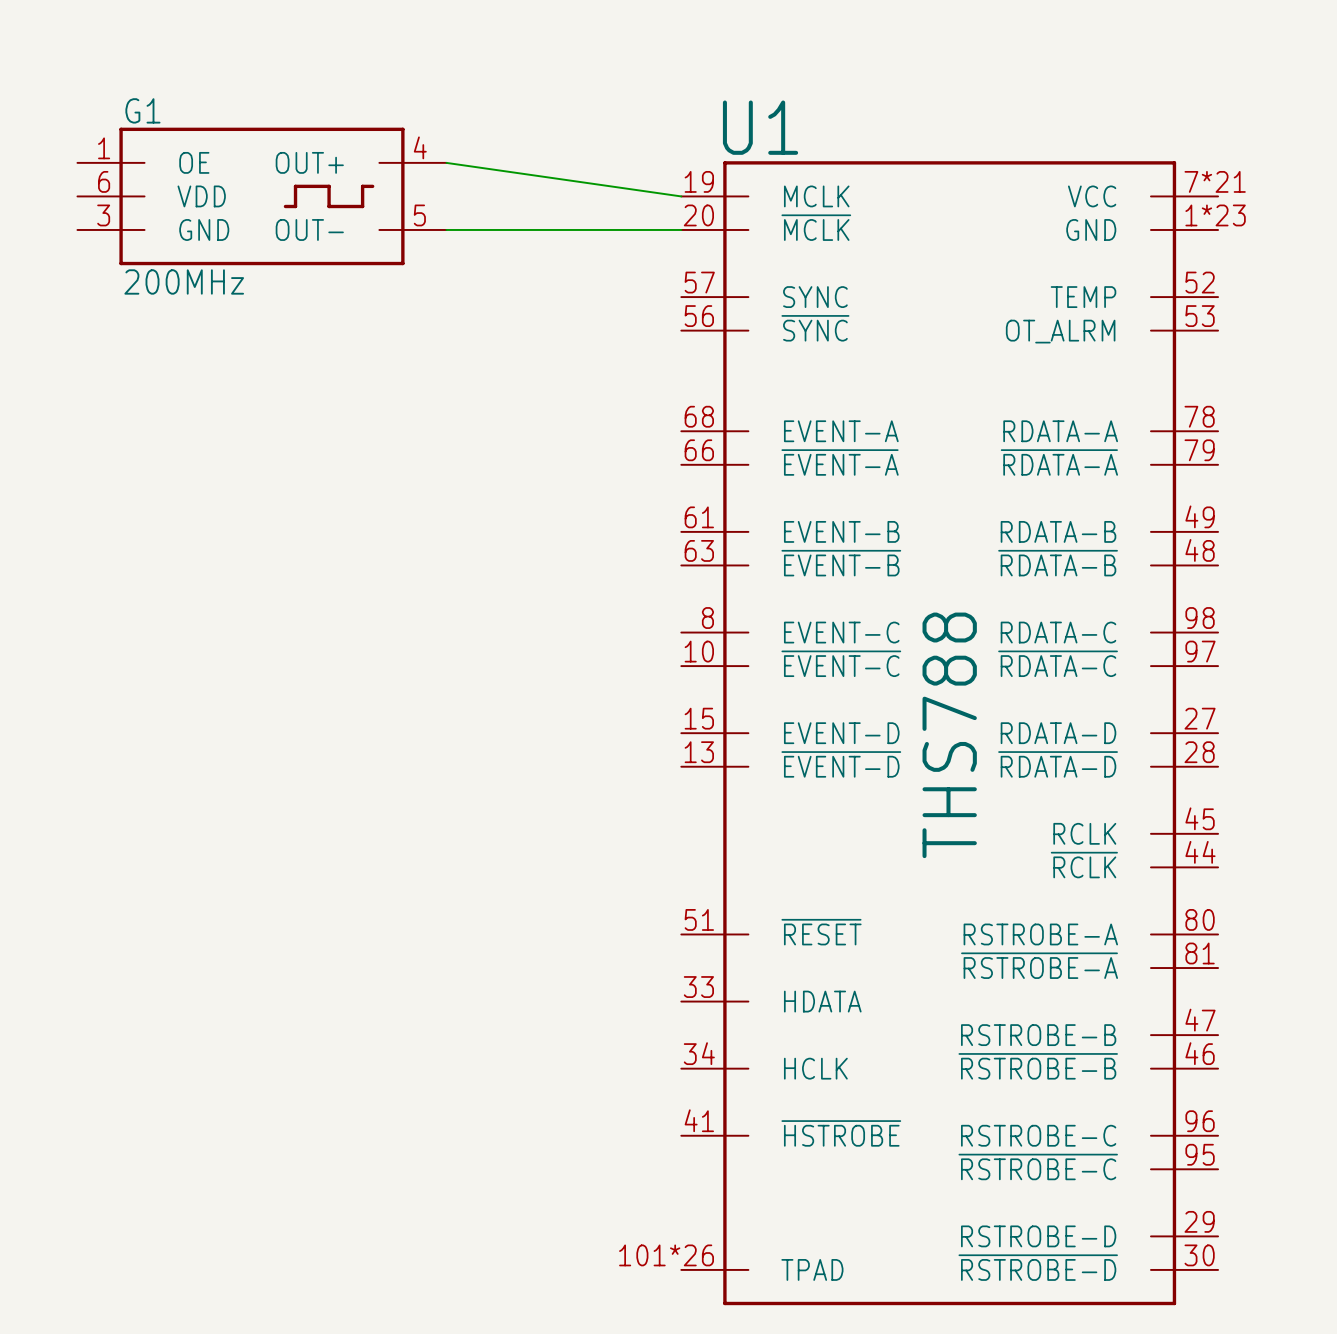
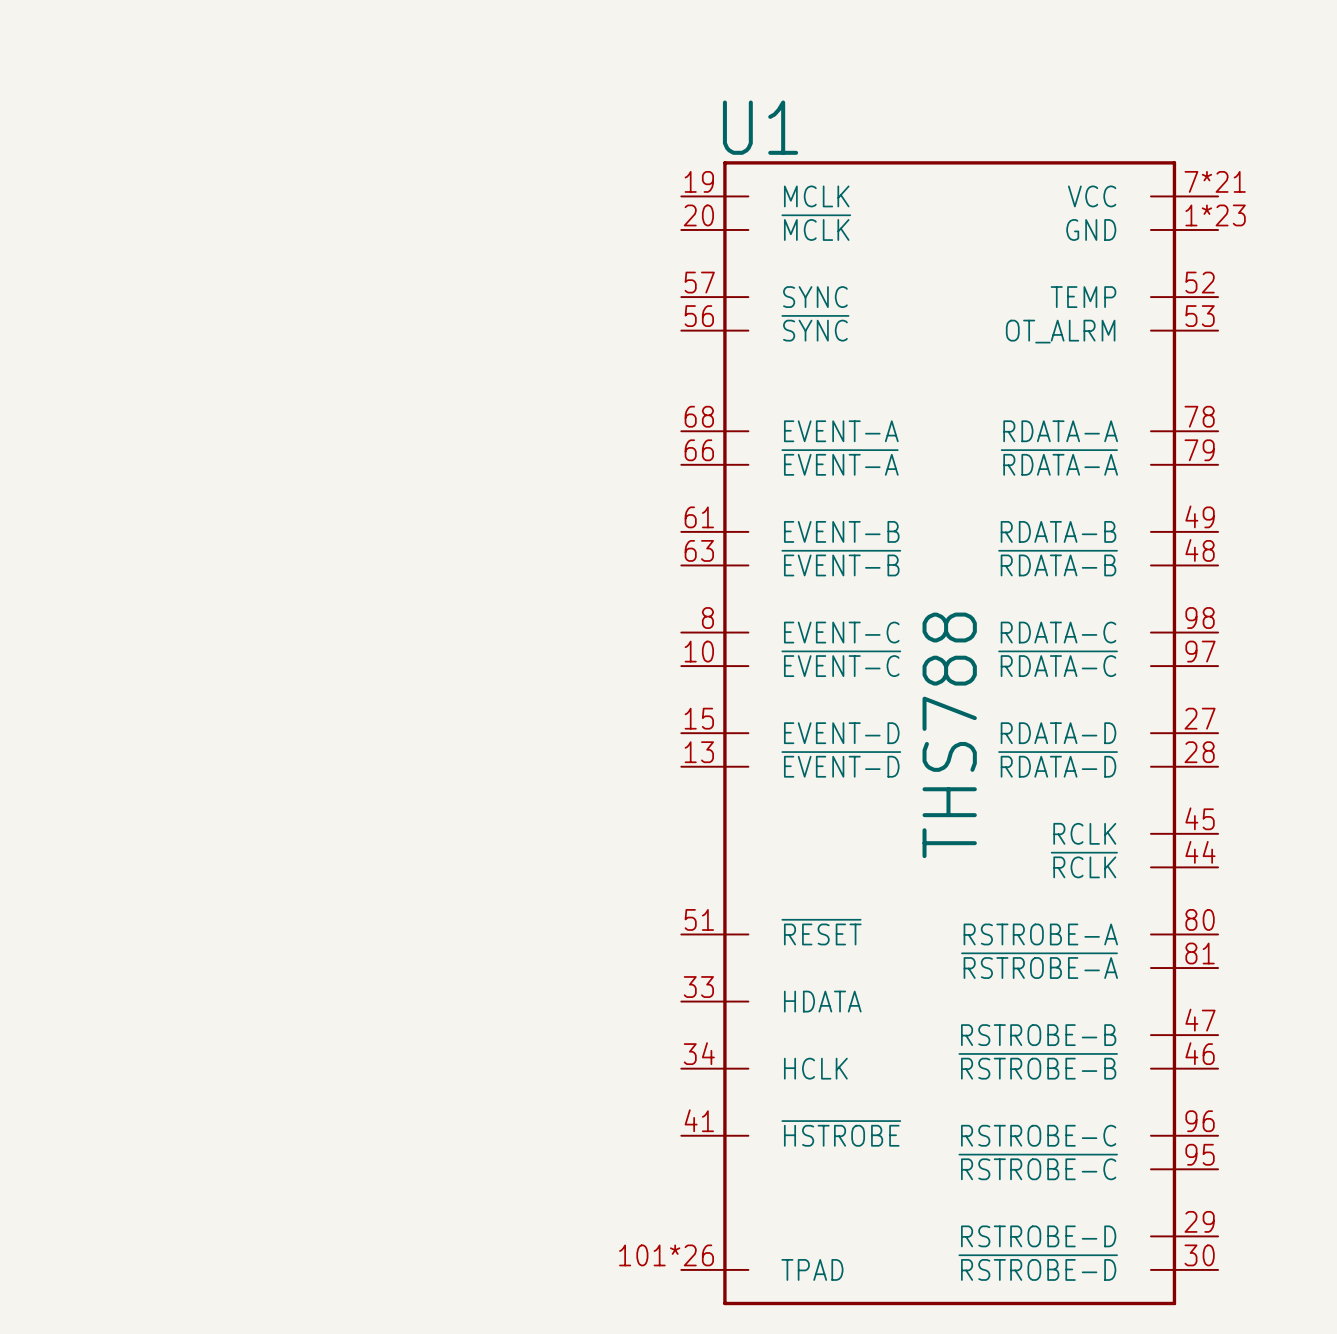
wire: (446, 162) (681, 196) -> none
G1: 200MHz (261, 196) -> none
wire: (446, 229) (681, 229) -> none

